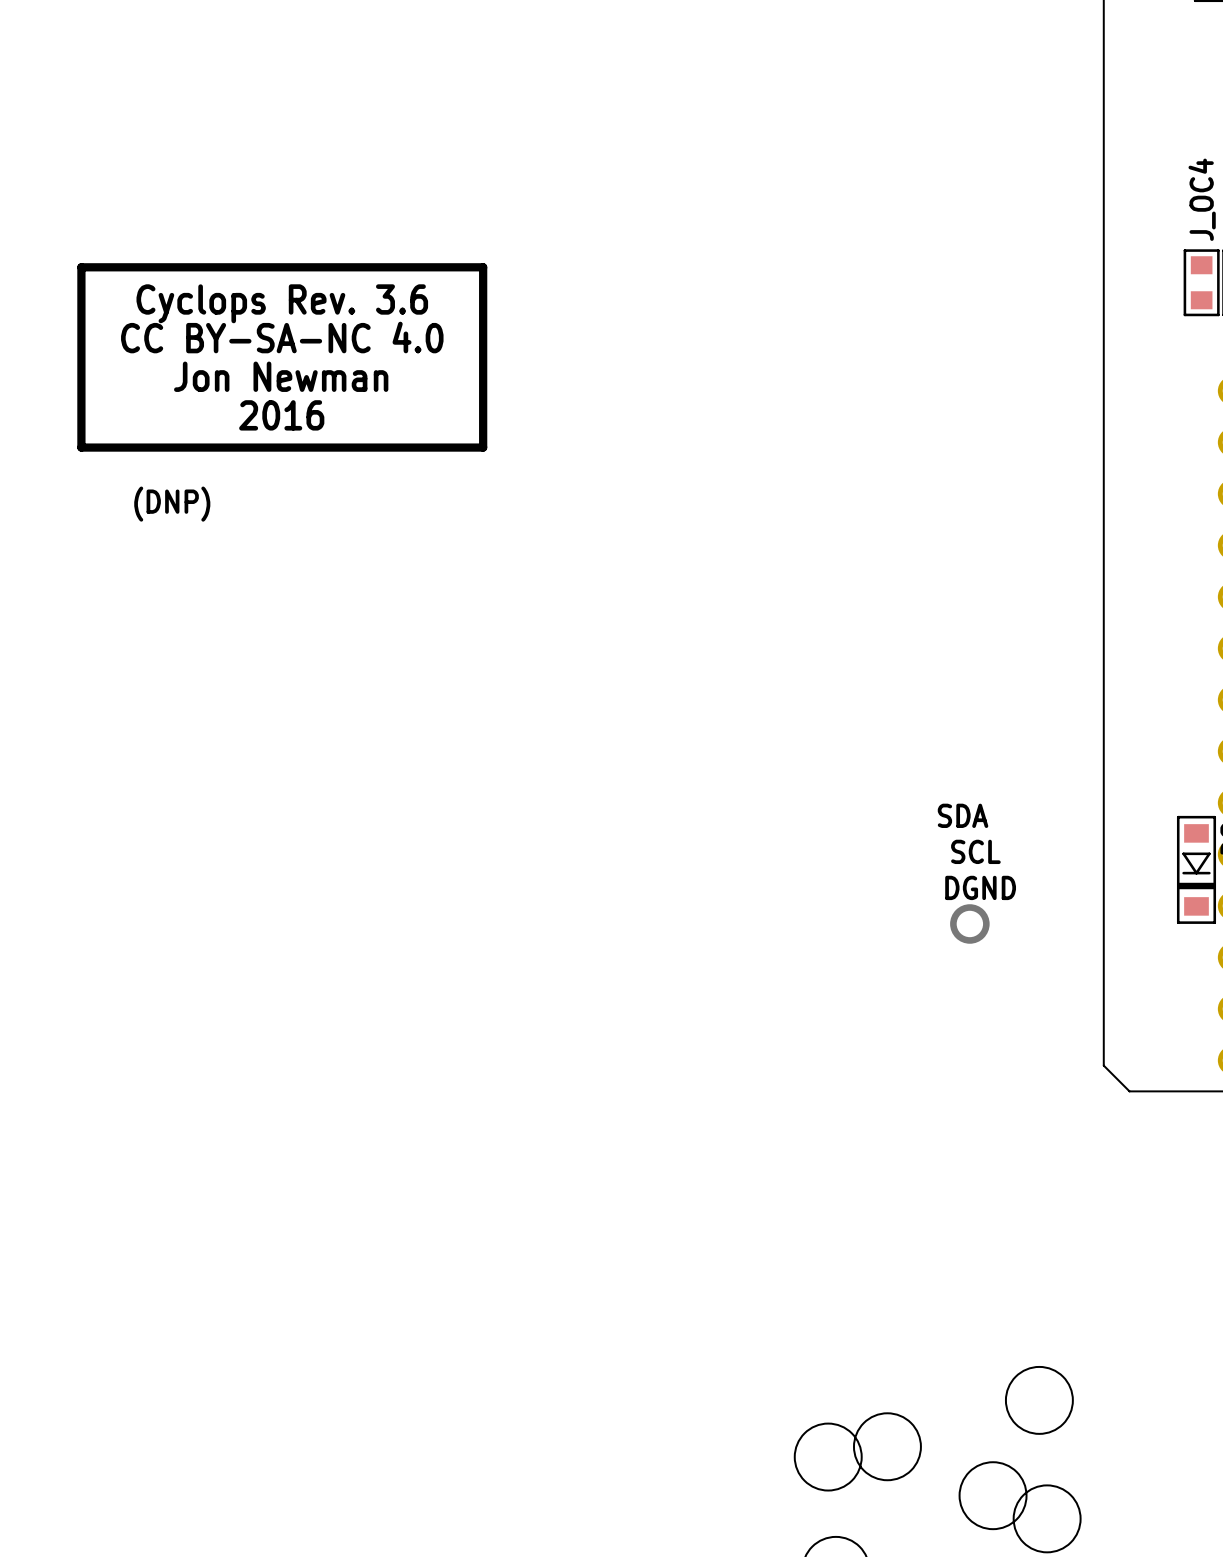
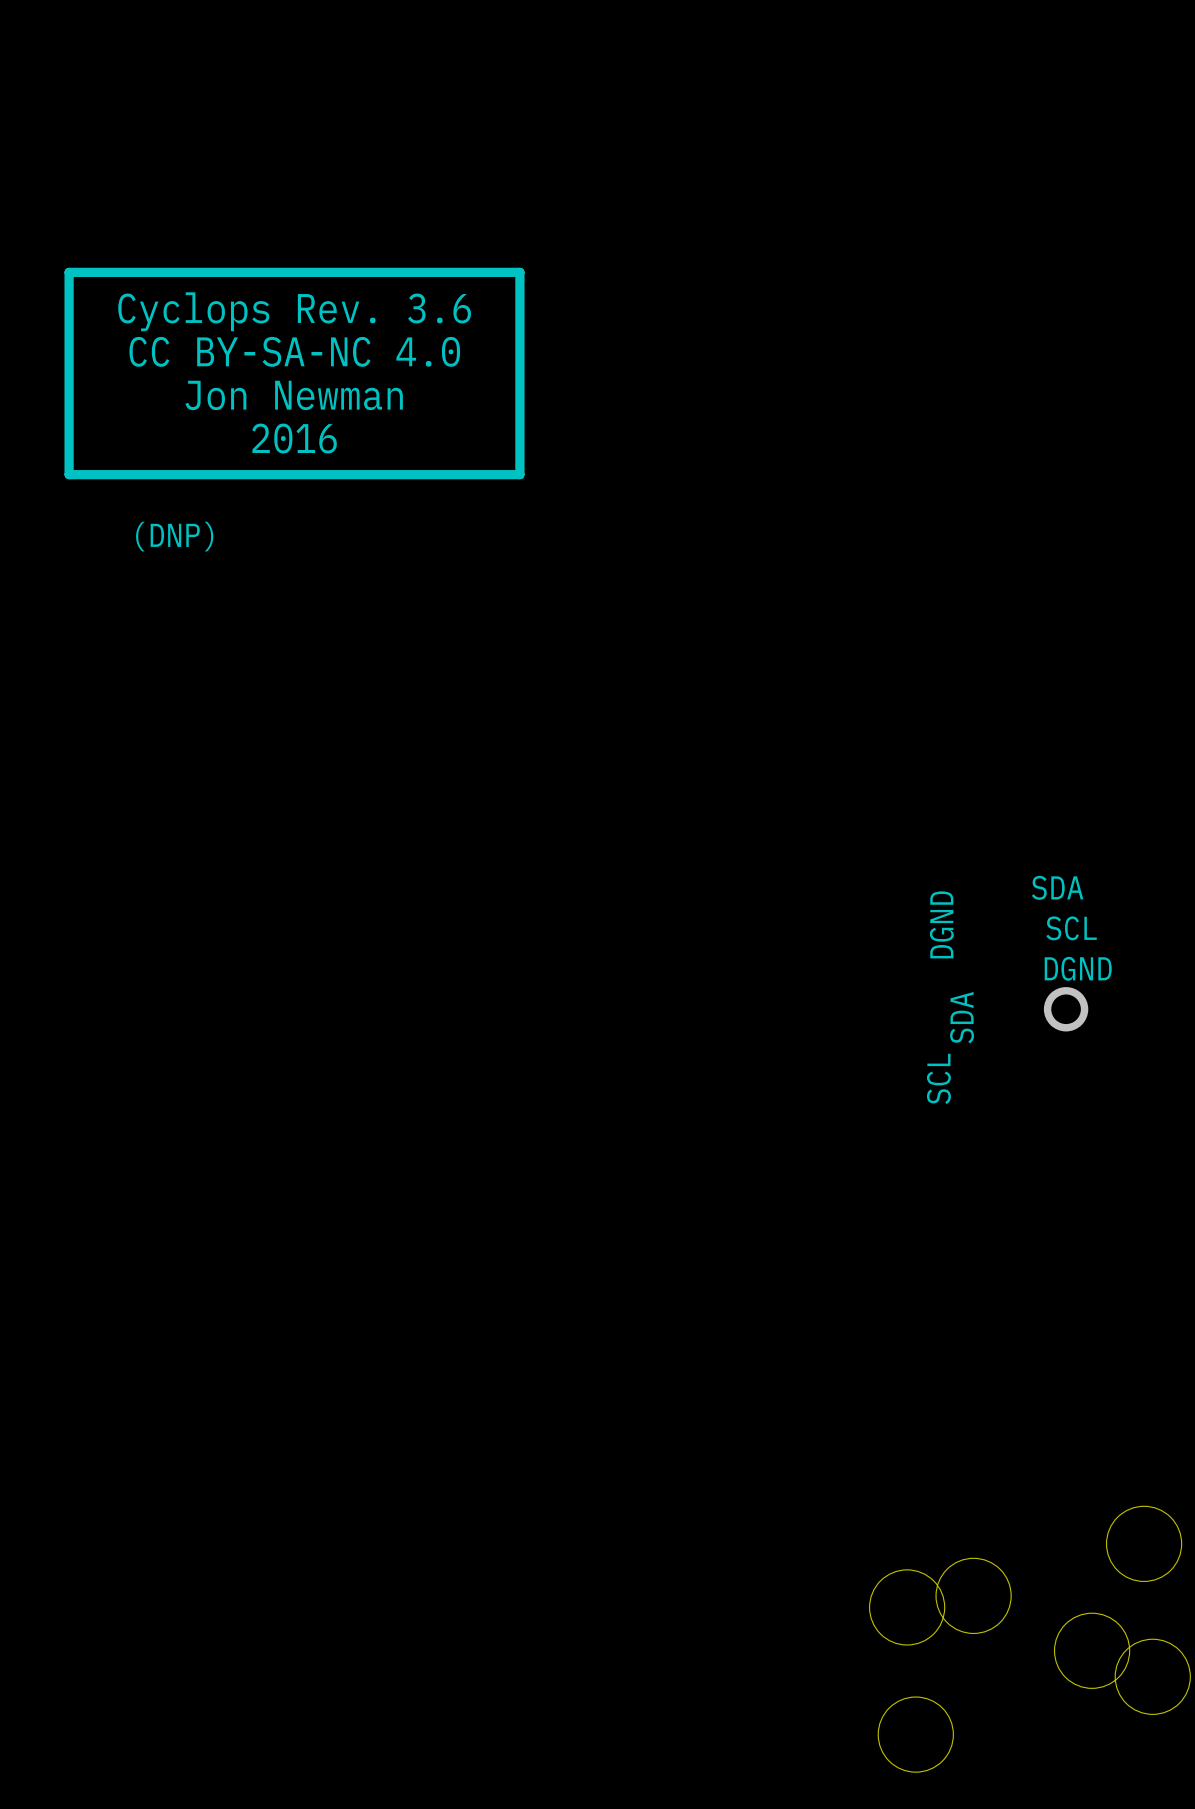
text: none -> DGND (941, 924)
text: none -> SDA (962, 1017)
text: none -> SCL (938, 1078)

